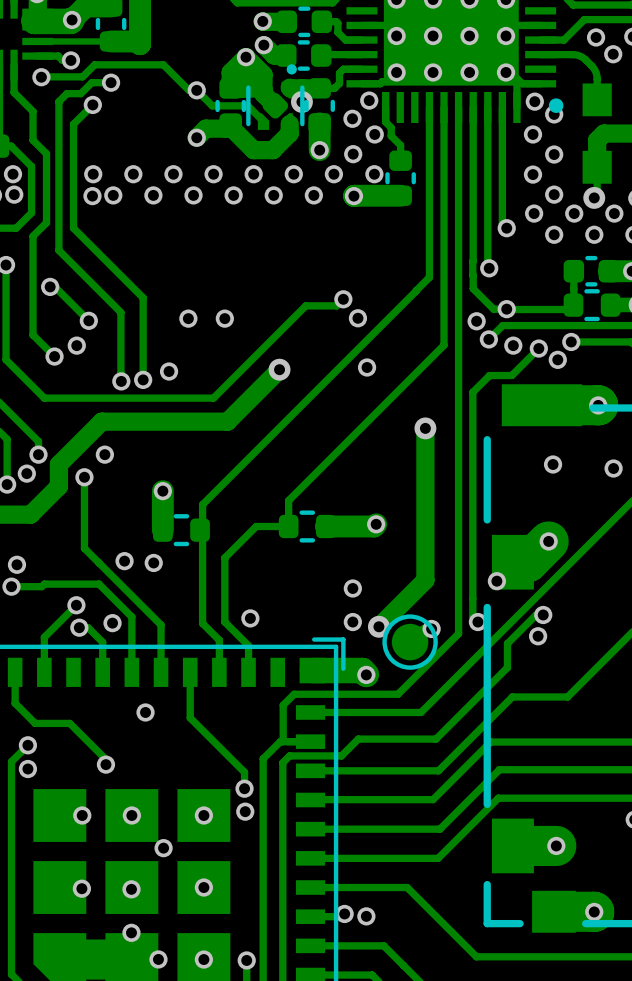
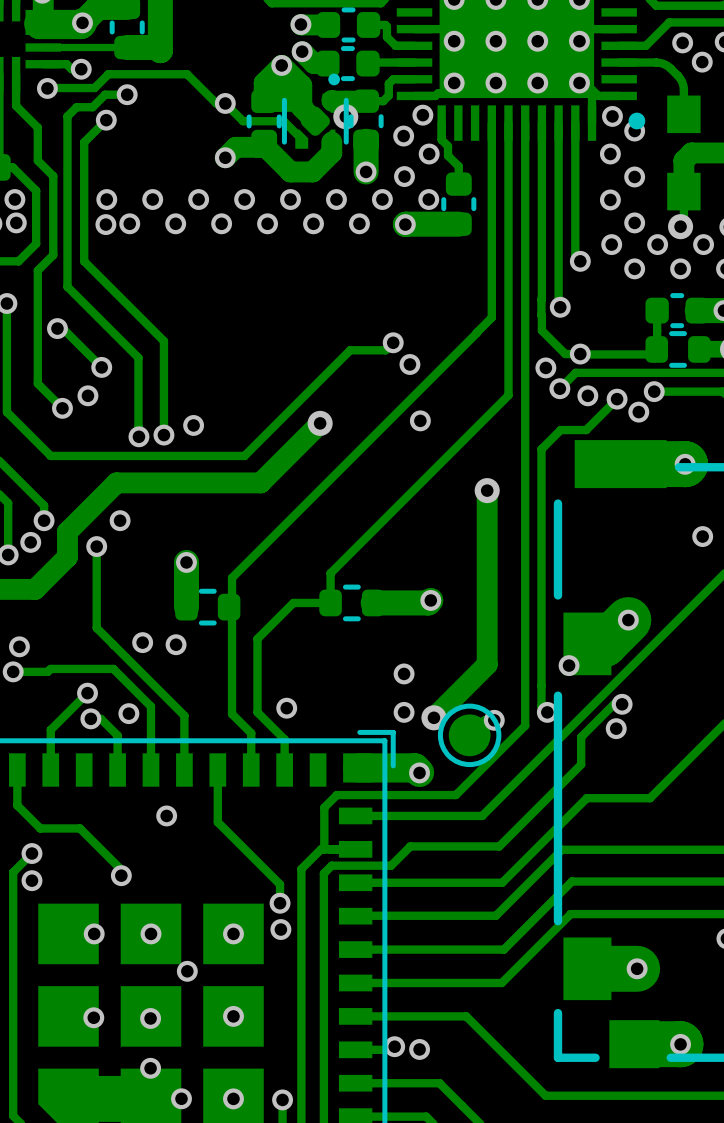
via: (188, 318) -> none
via: (224, 318) -> none
via: (553, 464) -> none

